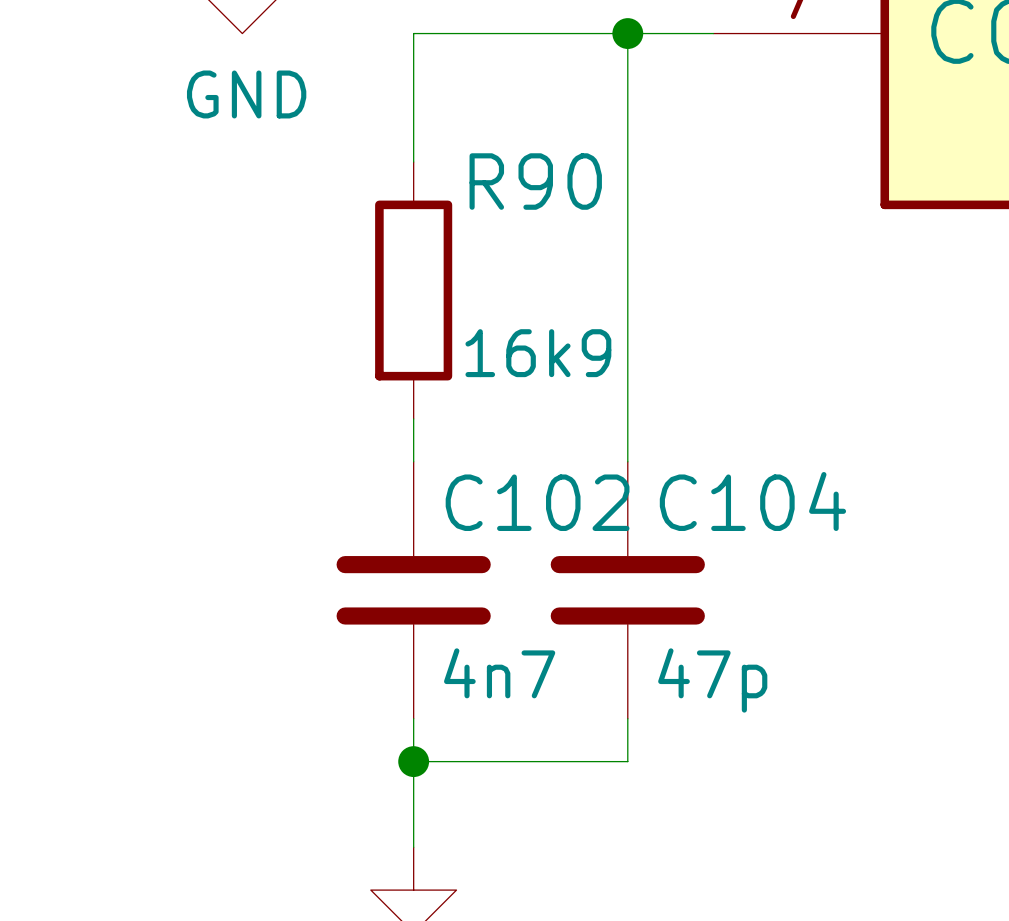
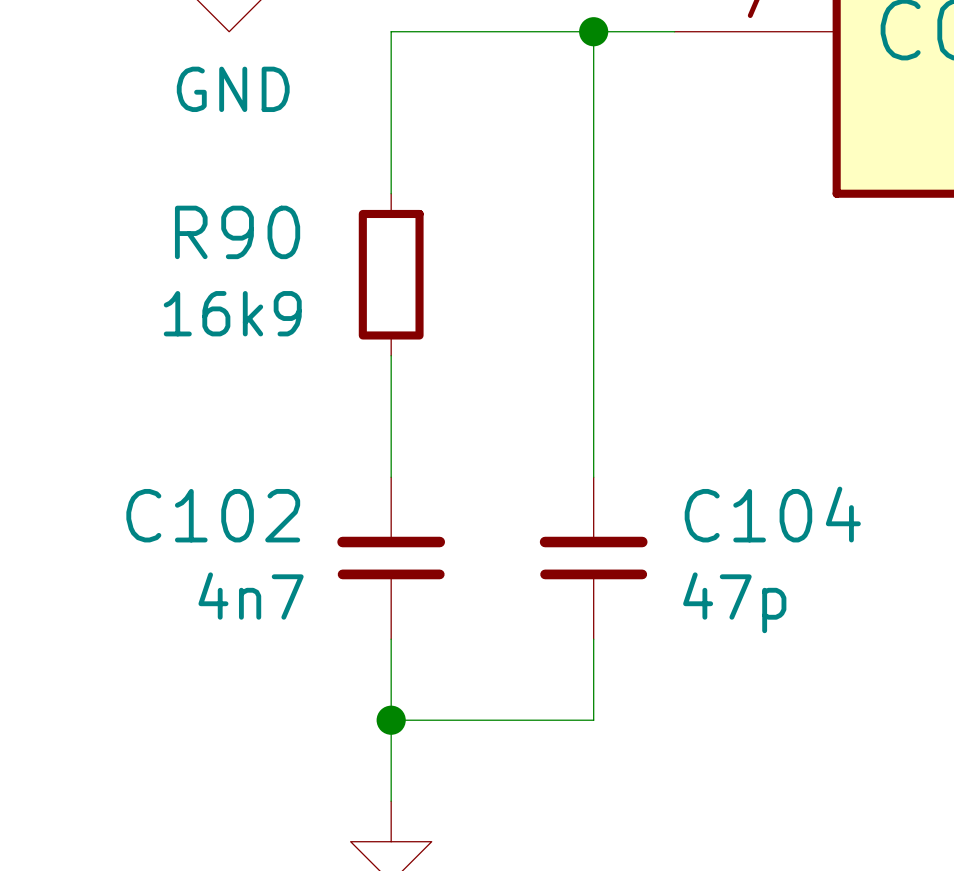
R90 symbol: [375, 162, 453, 419] -> [358, 193, 424, 356]
R90 name position: R90 (535, 181) -> R90 (237, 232)
R90 text position: 16k9 (538, 353) -> 16k9 (232, 313)
C102 symbol: [336, 461, 491, 719] -> [337, 477, 446, 640]
C104 symbol: [550, 461, 705, 719] -> [539, 477, 648, 640]
C104 name position: C104 (752, 501) -> C104 (772, 514)
C102 name position: C102 (537, 502) -> C102 (213, 515)
C102 text position: 4n7 (499, 673) -> 4n7 (251, 596)
C104 text position: 47p (712, 680) -> 47p (734, 602)

